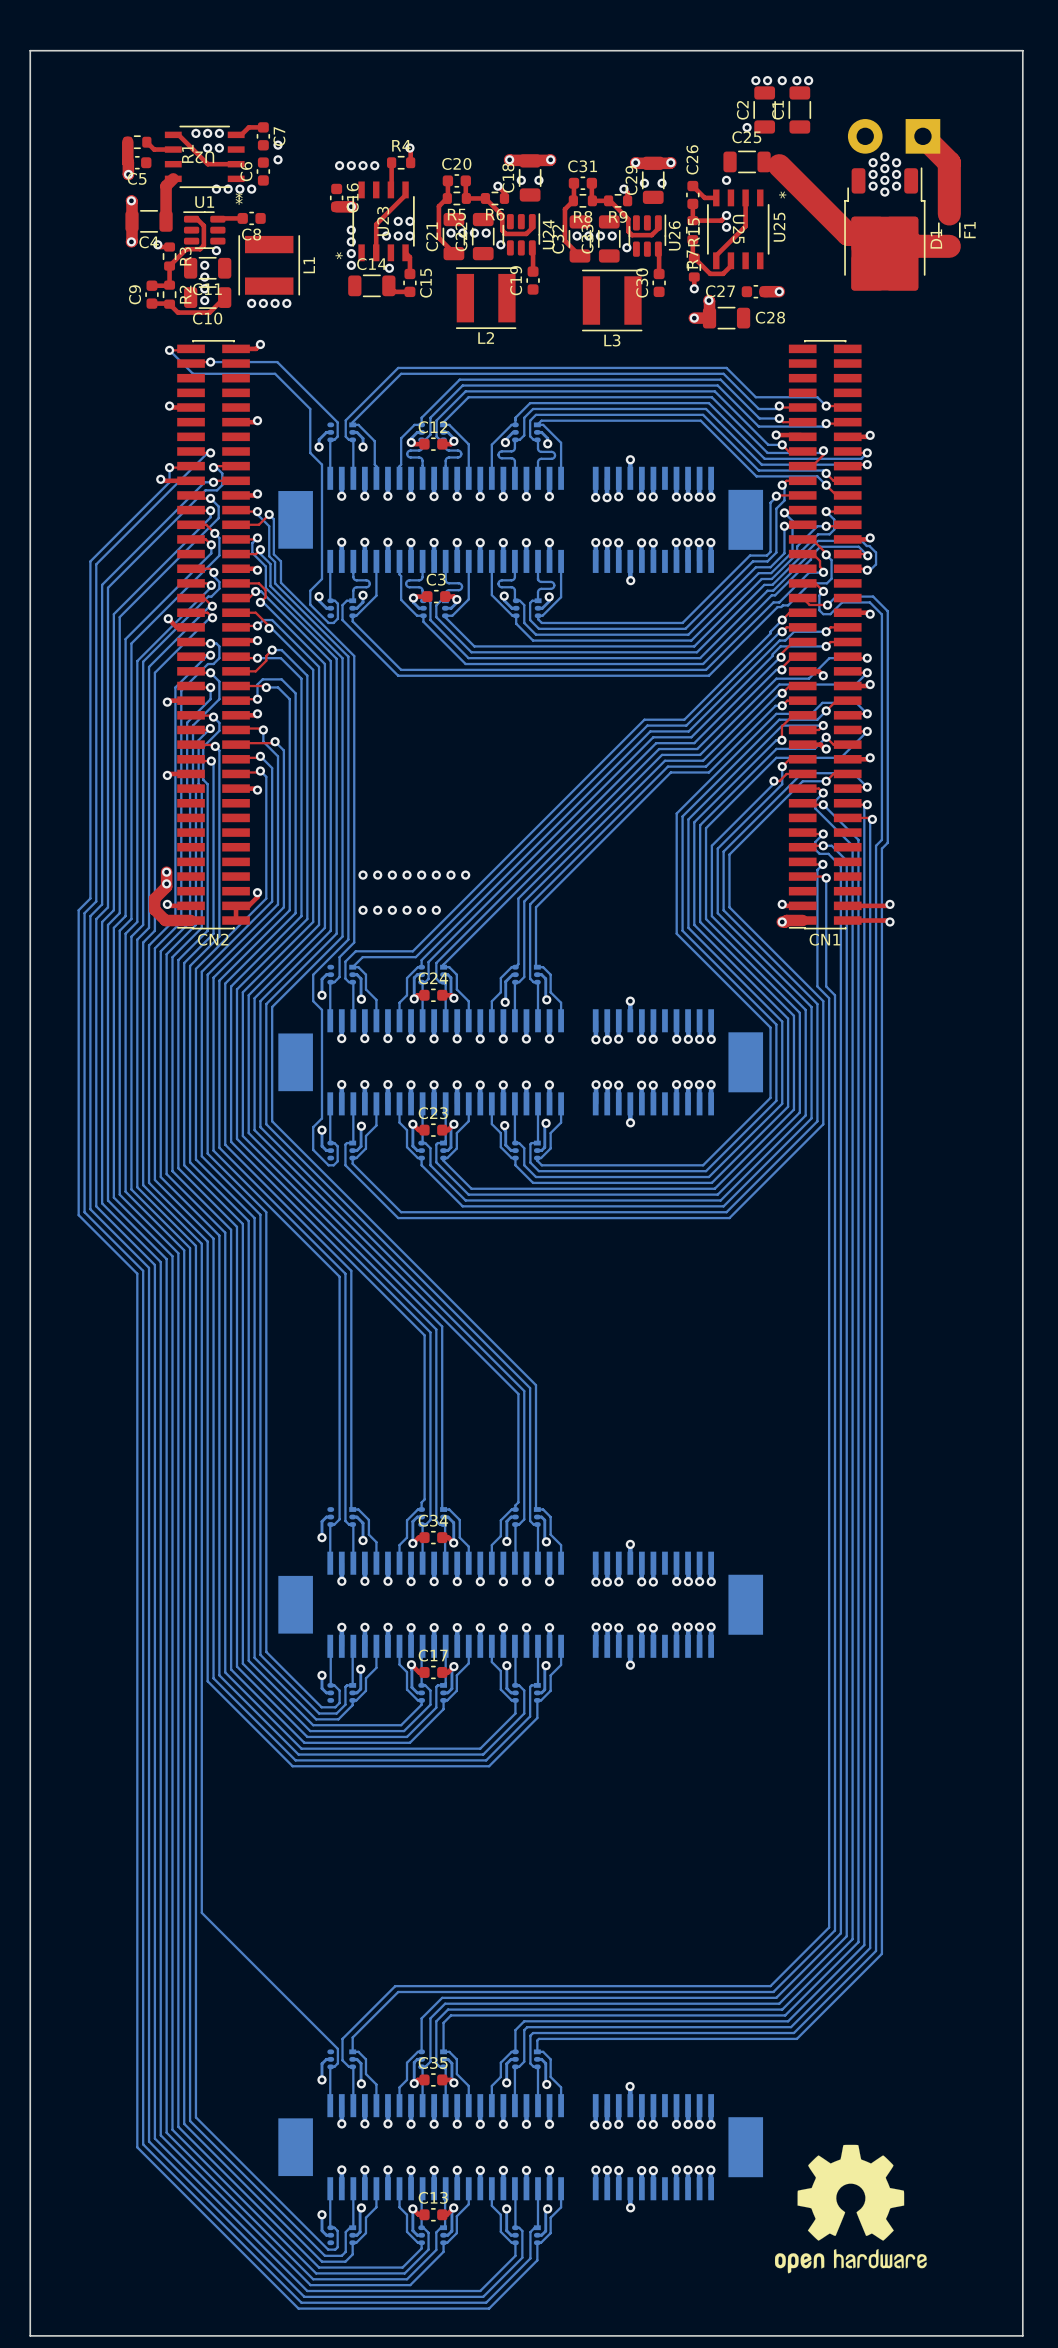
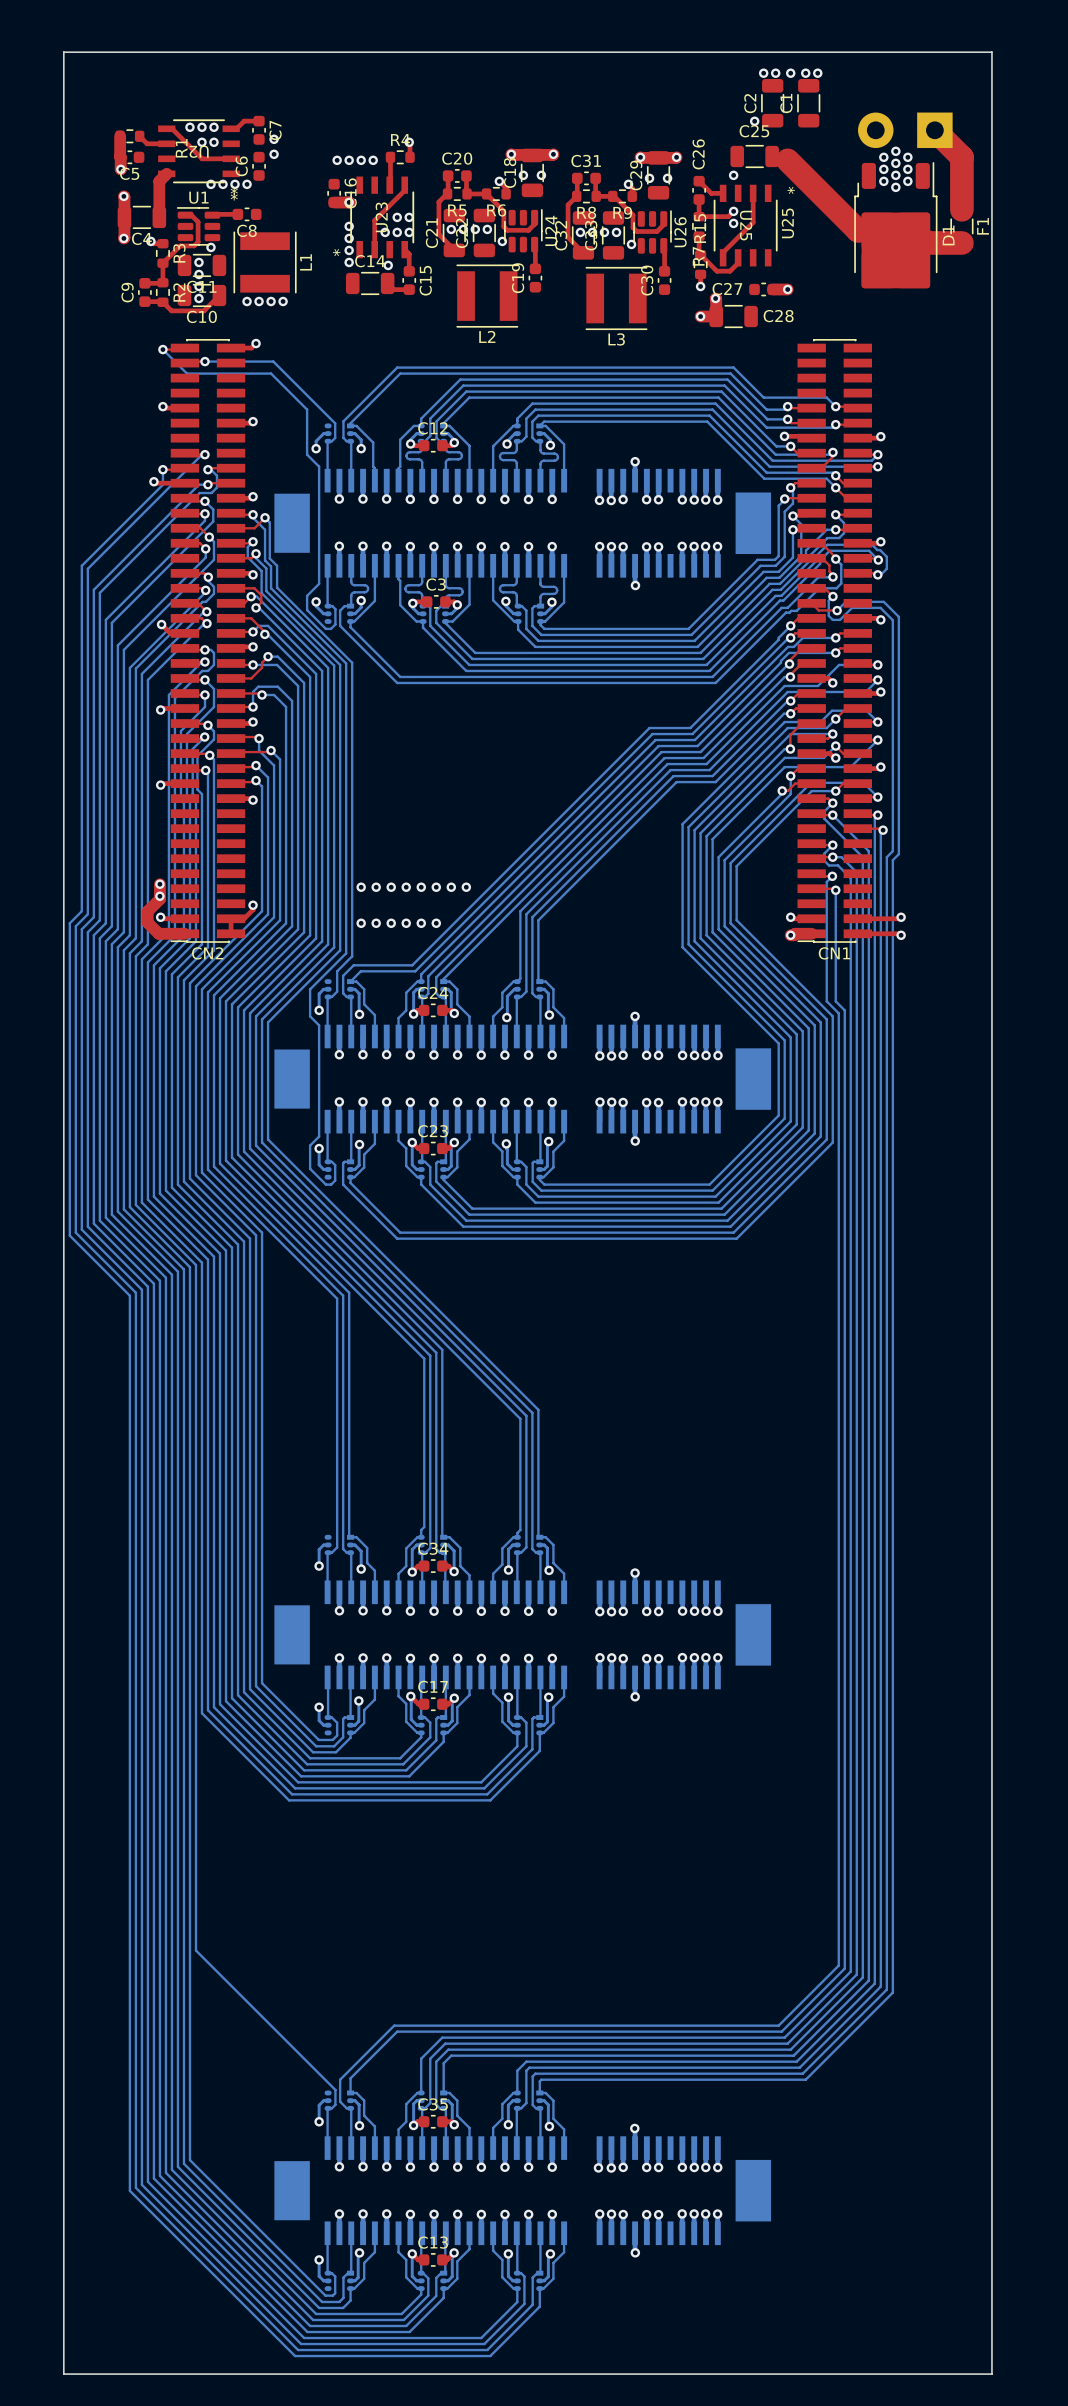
board edge: (30, 50) (1022, 50) (1022, 2335) (30, 2335) (30, 50) -> (63, 52) (63, 2374) (991, 2374) (991, 52) (63, 52)
drawing: [774, 2144, 927, 2274] -> none

